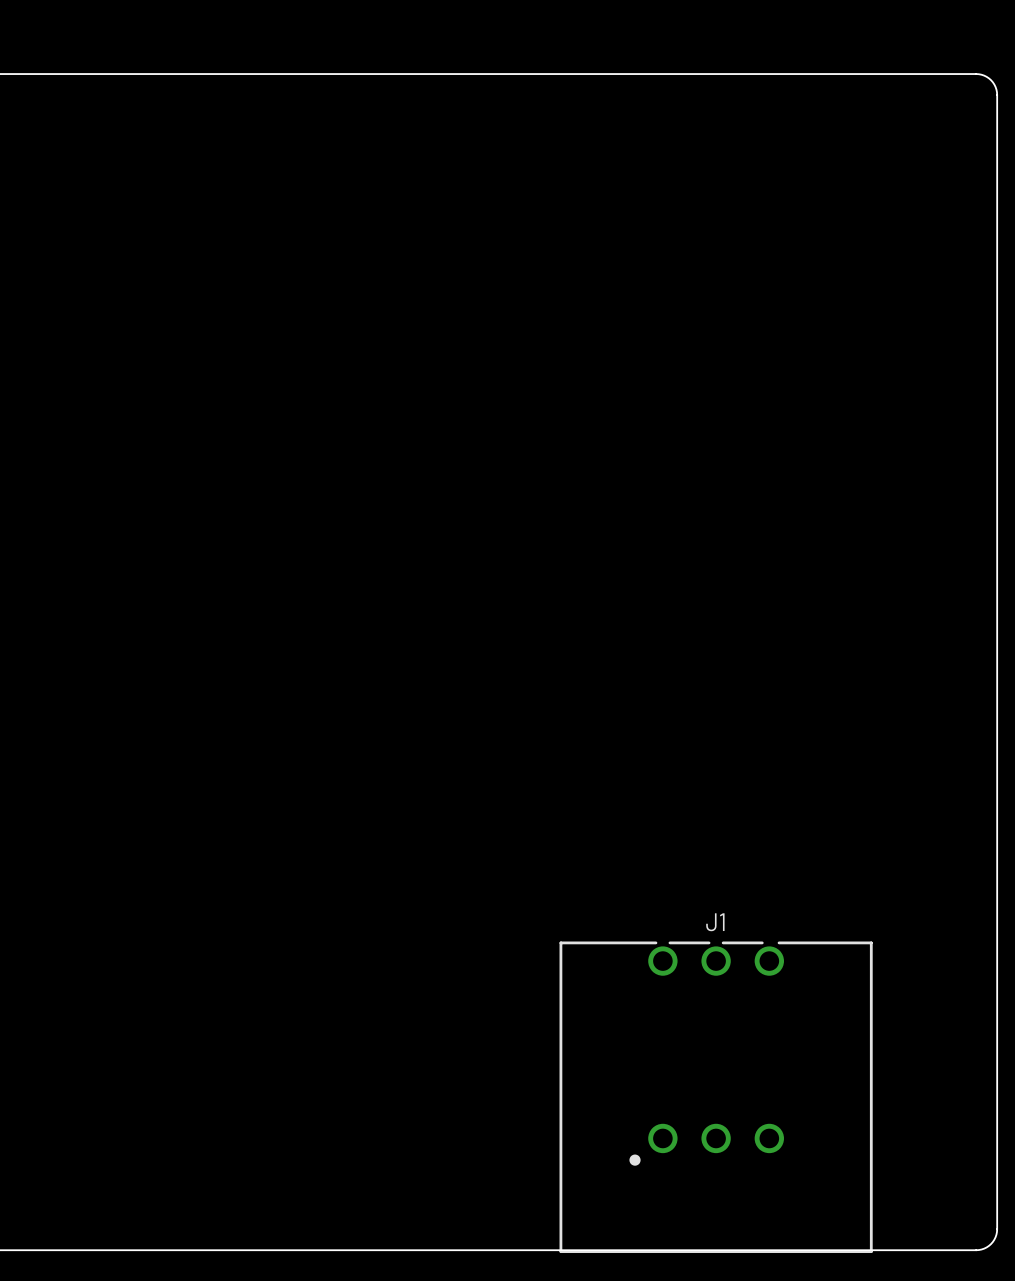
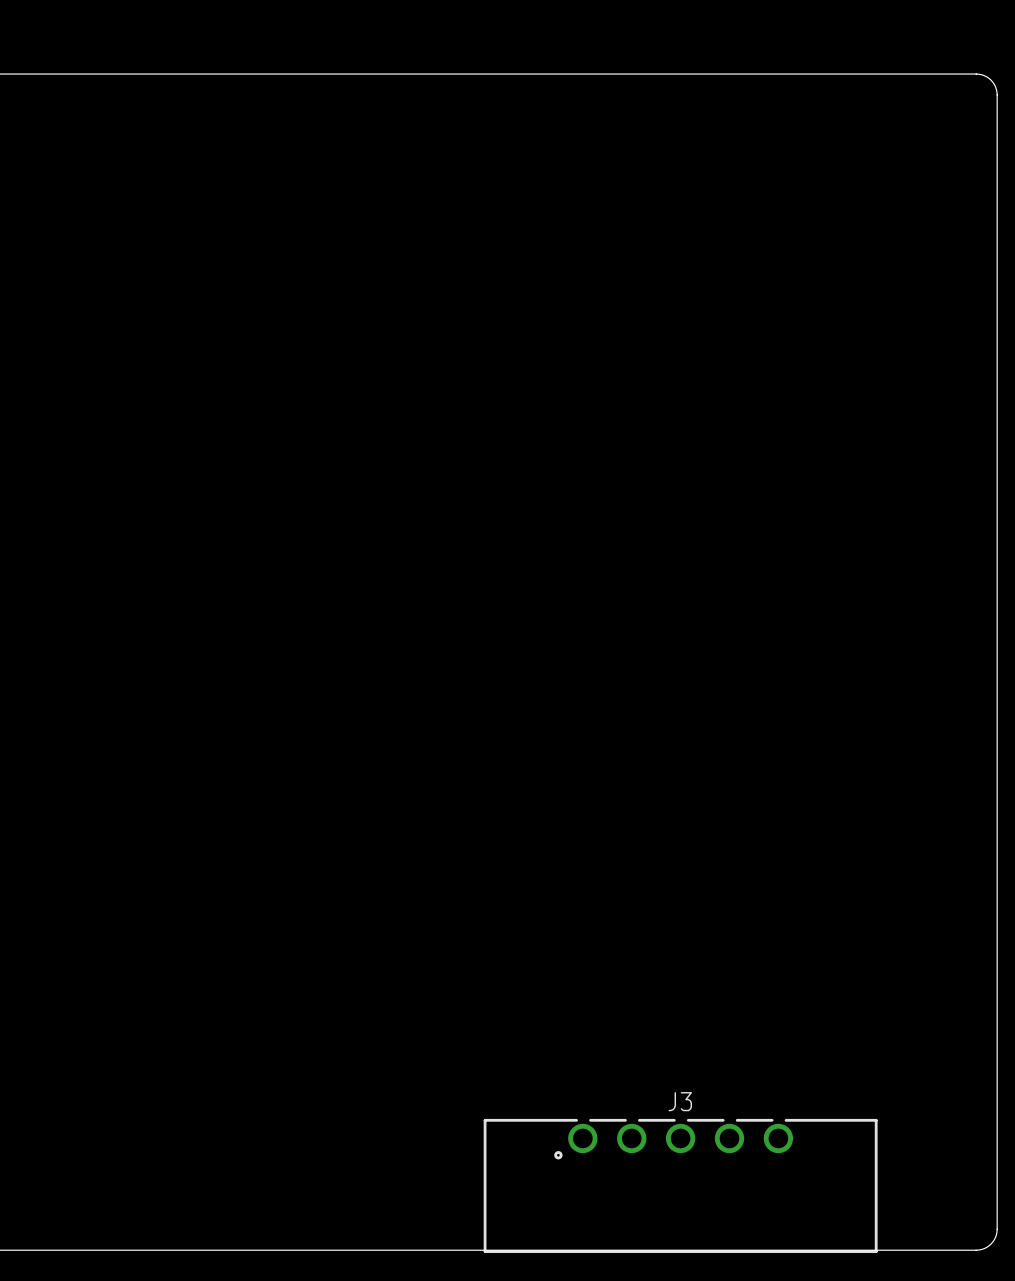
J1: (716, 1097) -> none
J3: none -> (680, 1185)

